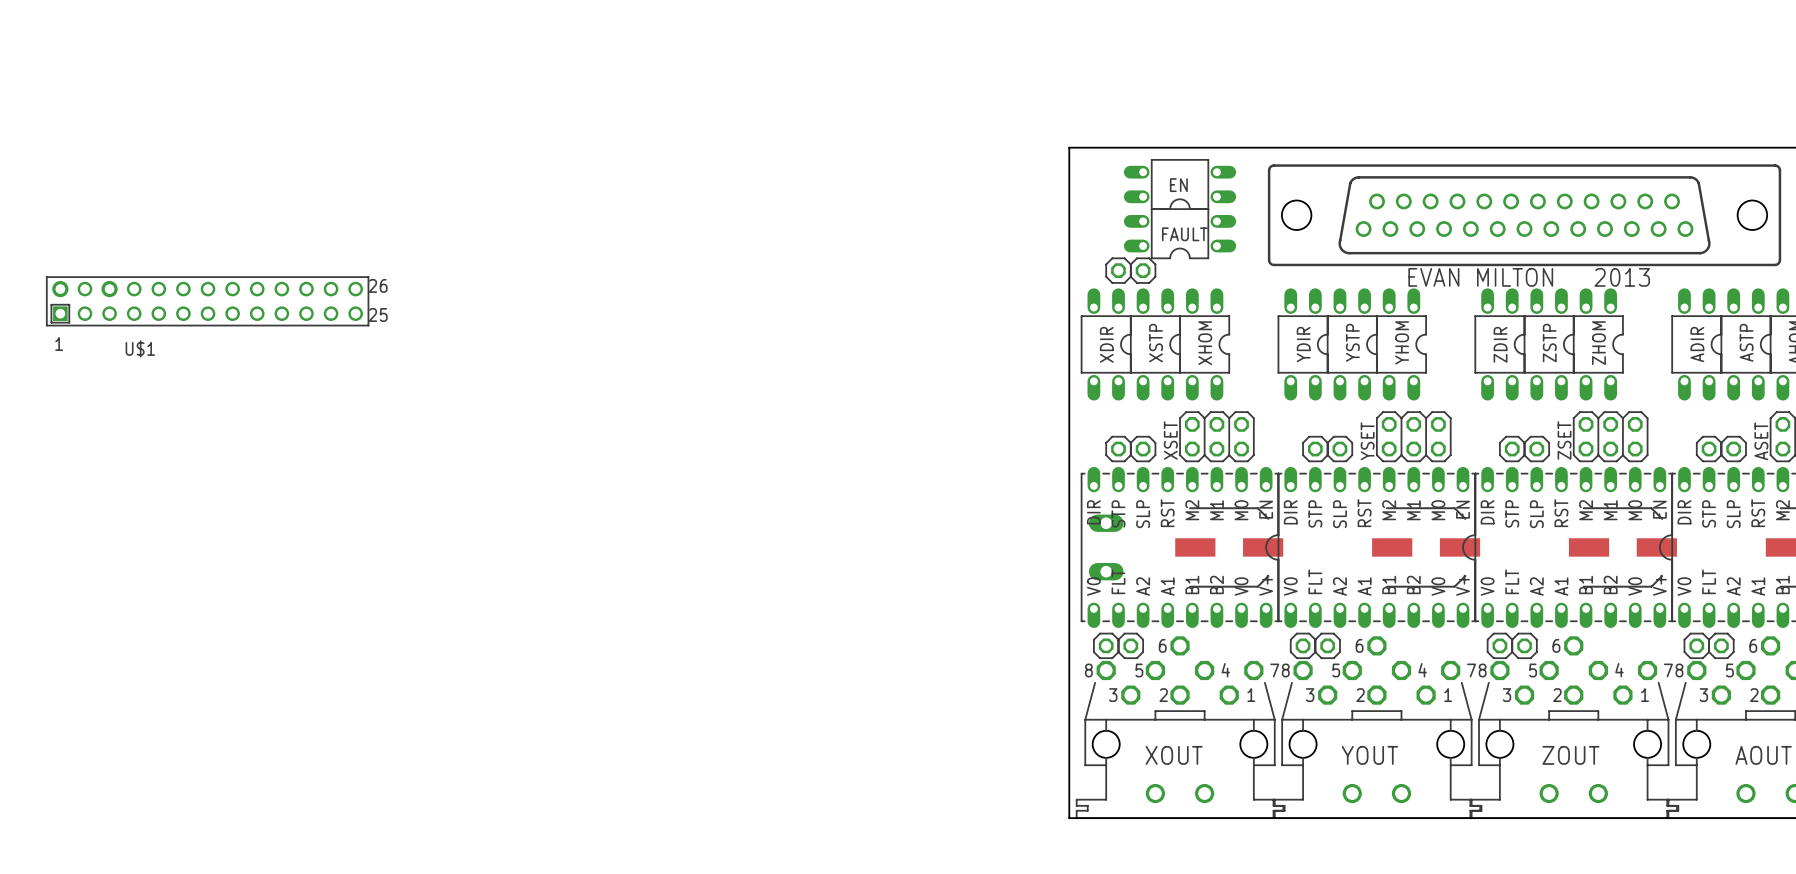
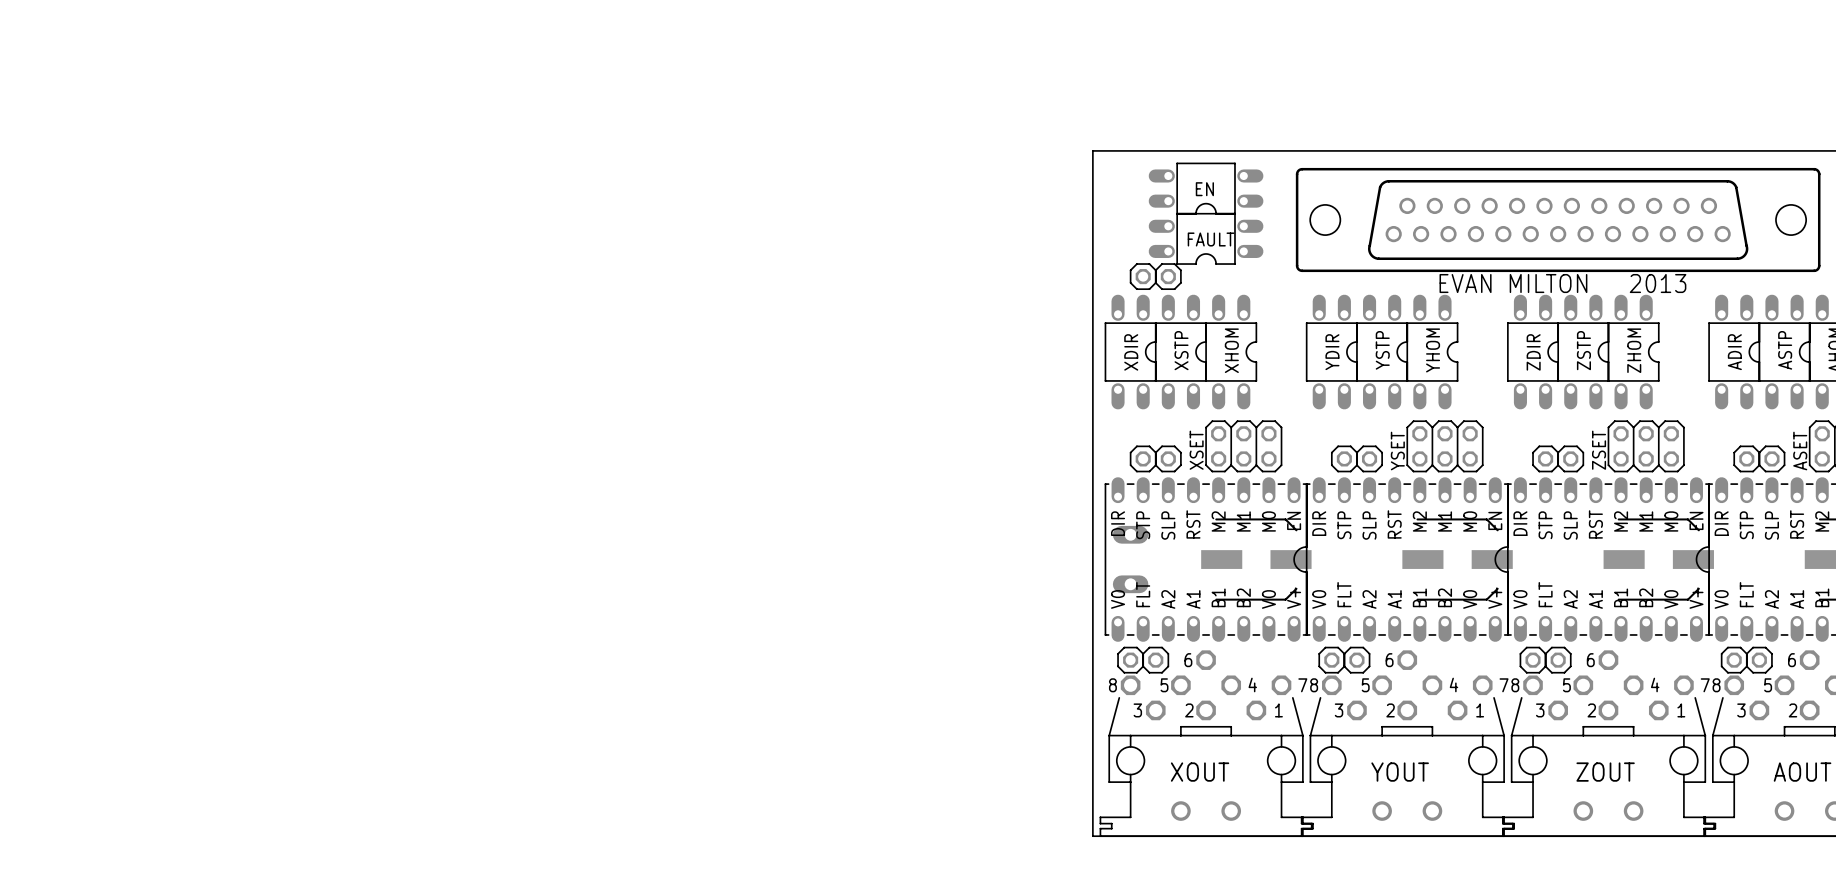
U$1: (207, 301) -> none

